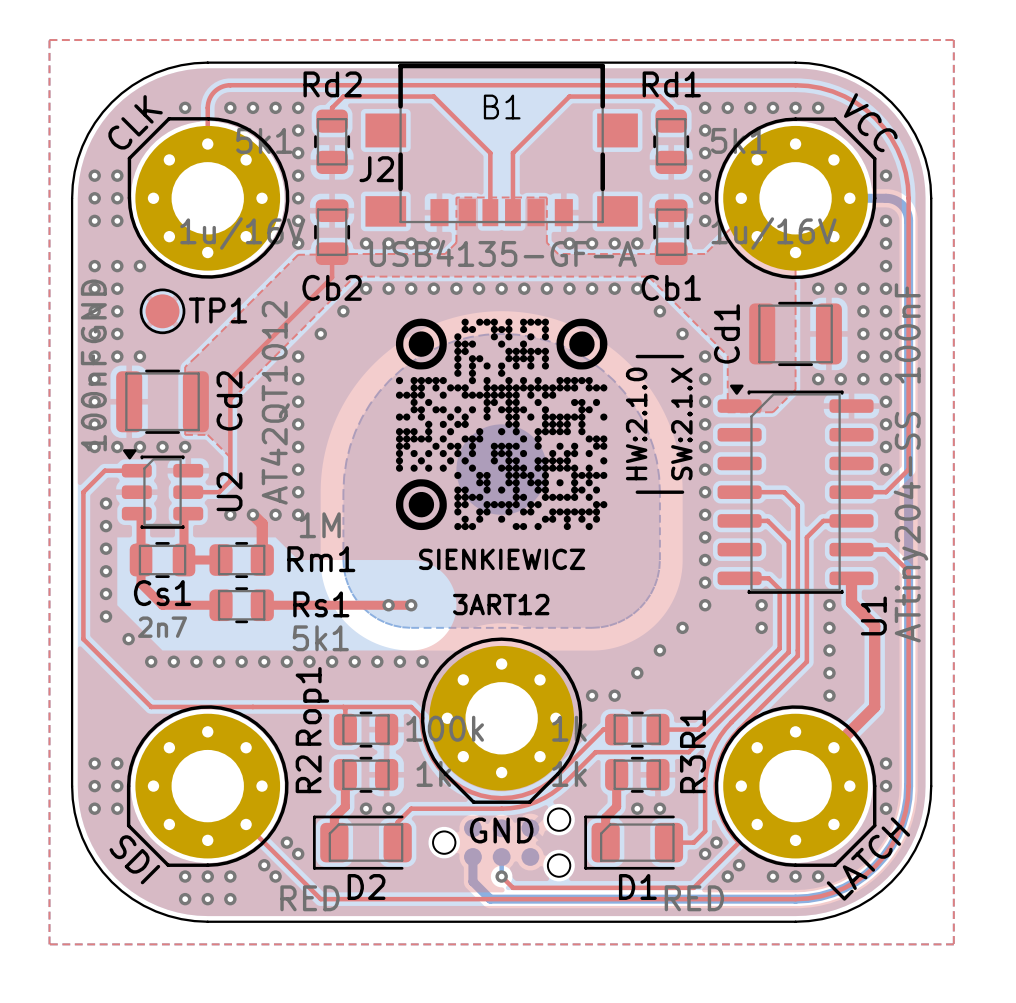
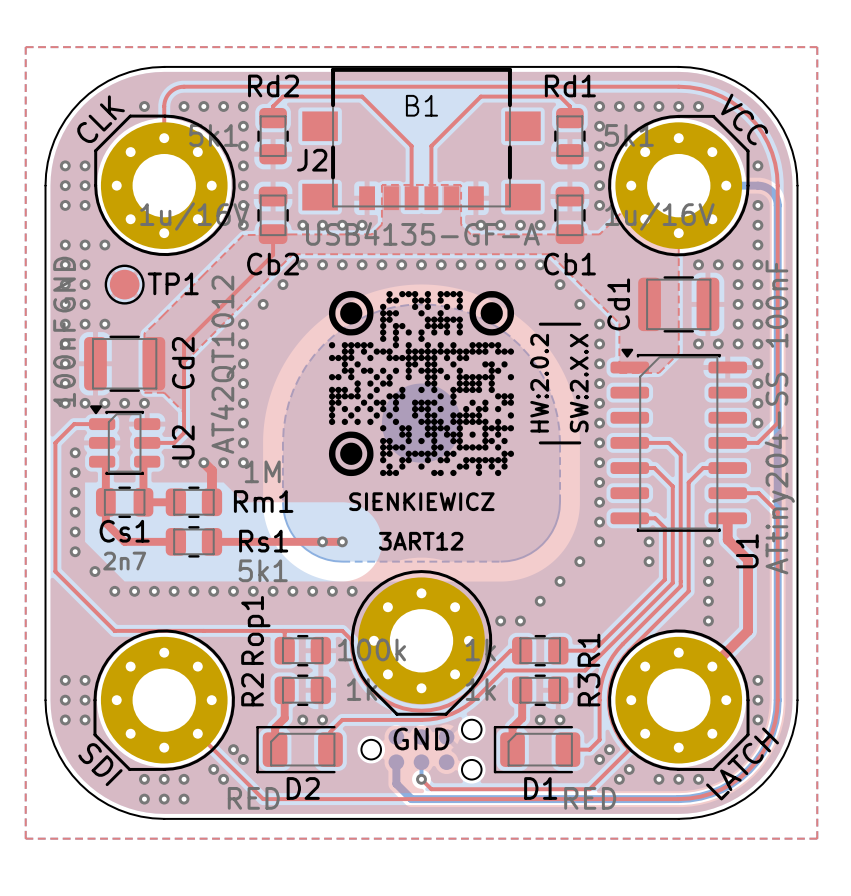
text: HW:2.1.0 (636, 423) -> HW:2.0.2 (539, 383)
text: SW:2.1.X (681, 423) -> SW:2.X.X (579, 383)

